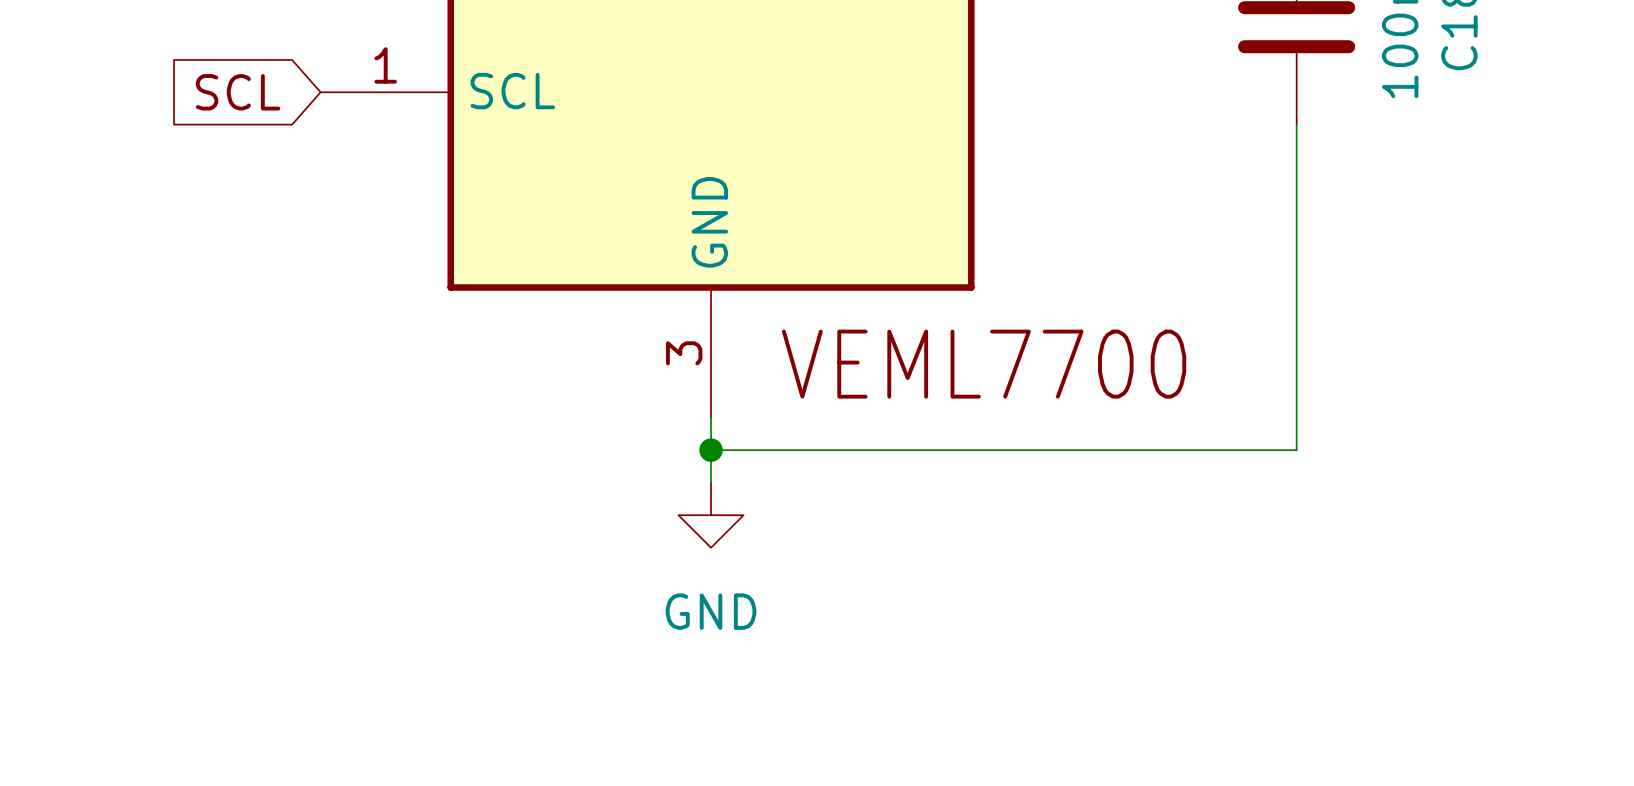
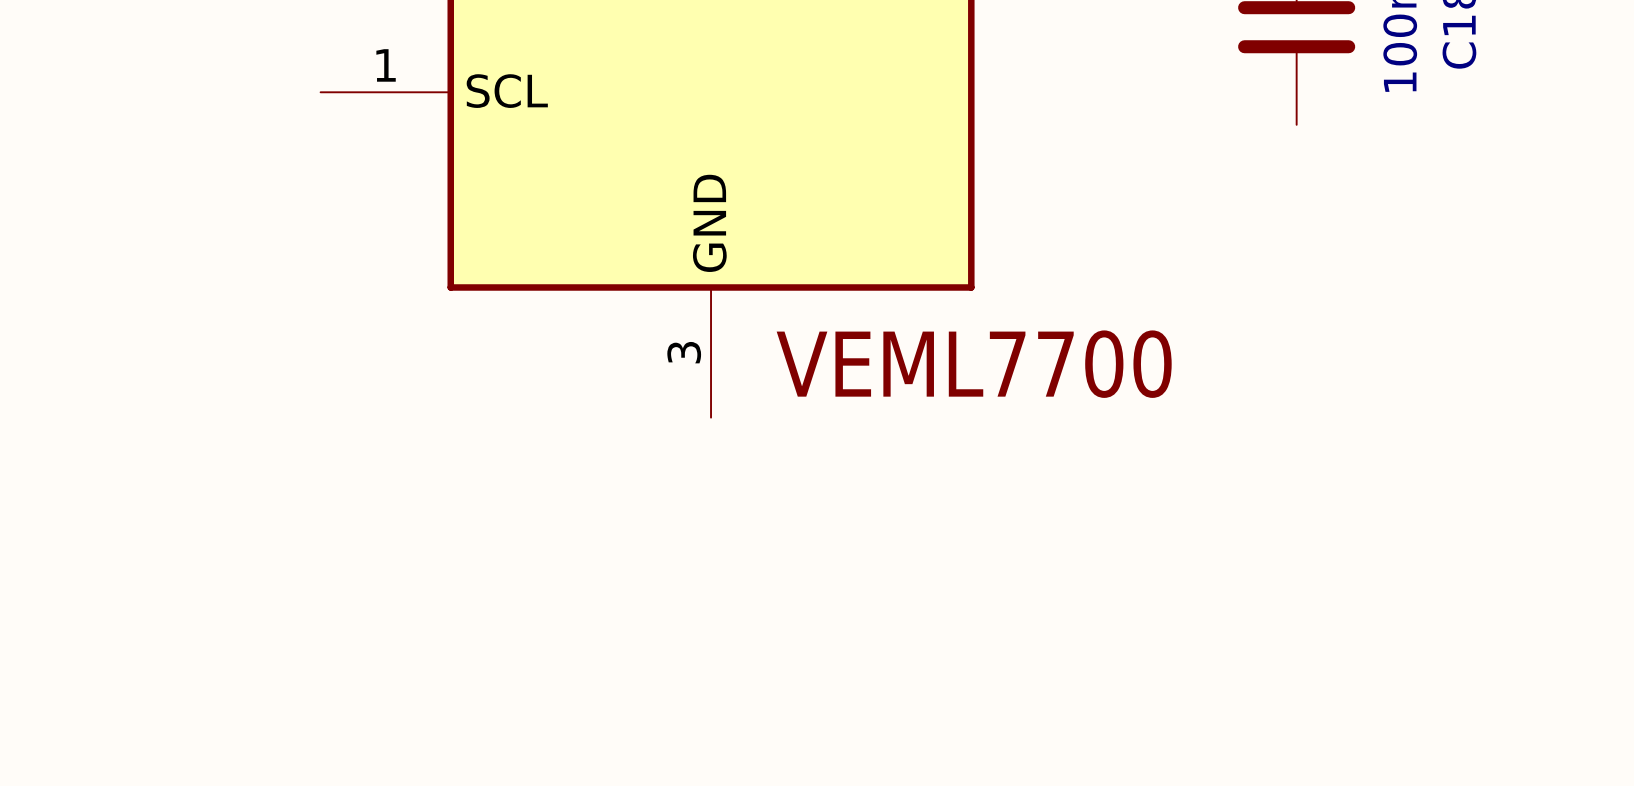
global label: SCL (238, 92) -> none
wire: (1296, 124) (1296, 450) (711, 450) -> none
wire: (711, 417) (711, 482) -> none
junction: (711, 450) -> none
power symbol: GND (711, 515) -> none

